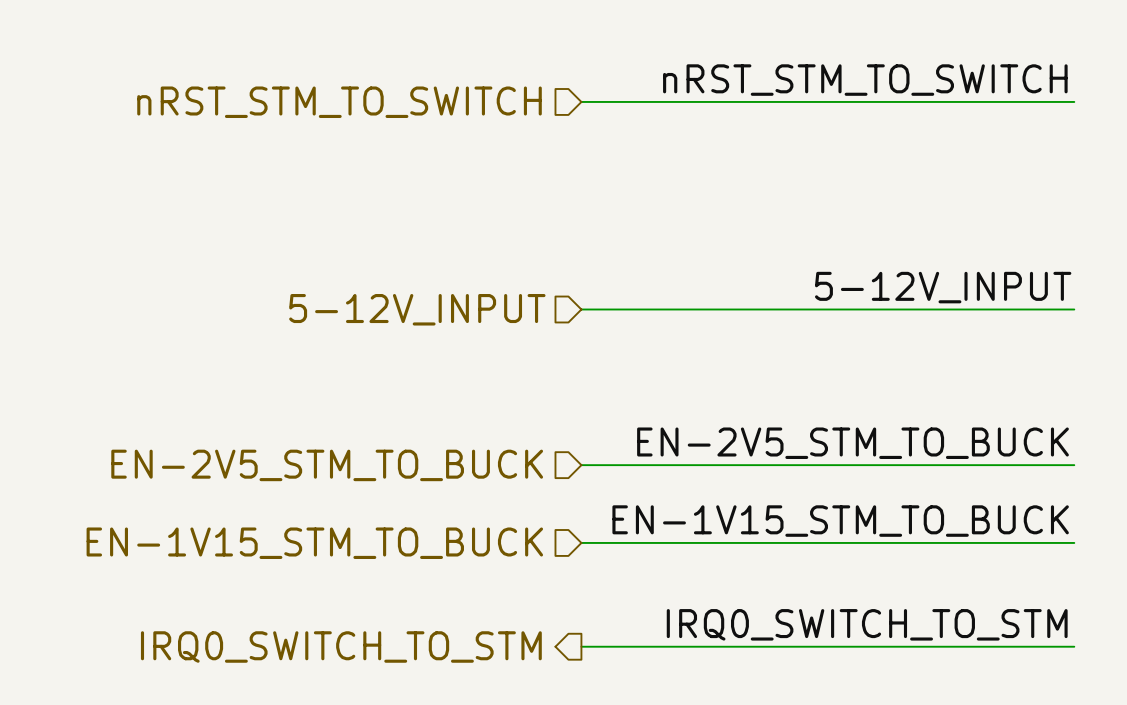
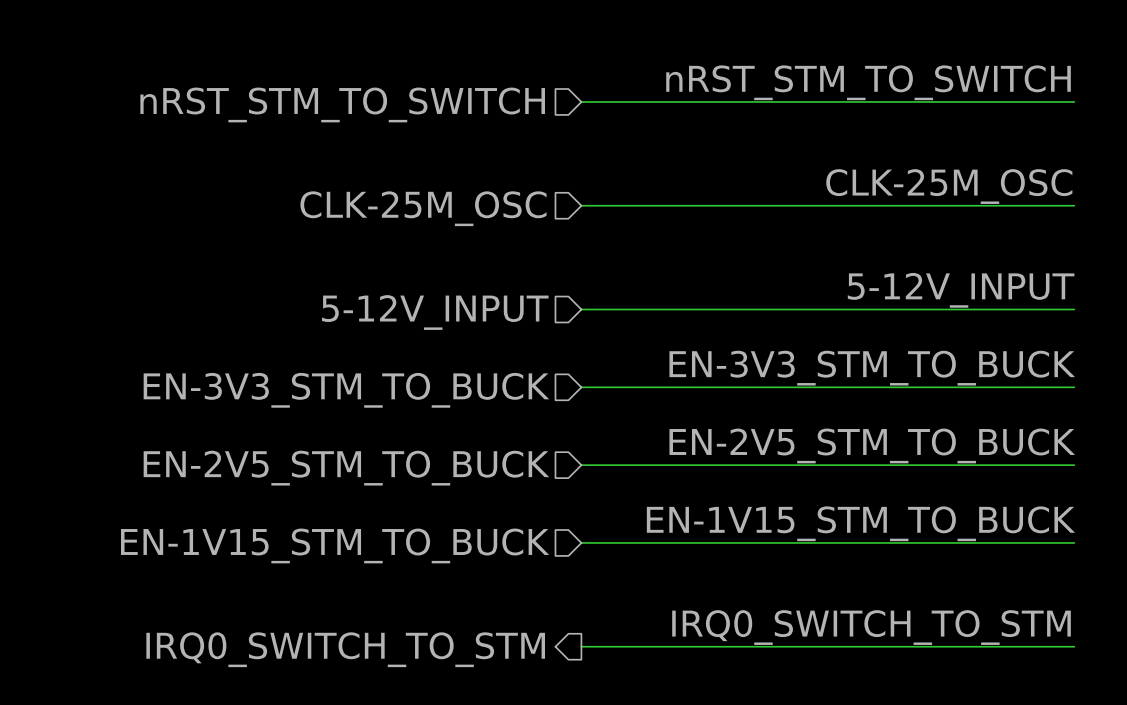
label: none -> CLK-25M_OSC (949, 186)
wire: none -> (581, 205) (1074, 205)
hierarchical label: none -> CLK-25M_OSC (423, 208)
label: none -> EN-3V3_STM_TO_BUCK (872, 368)
hierarchical label: none -> EN-3V3_STM_TO_BUCK (346, 390)
wire: none -> (581, 387) (1074, 387)

